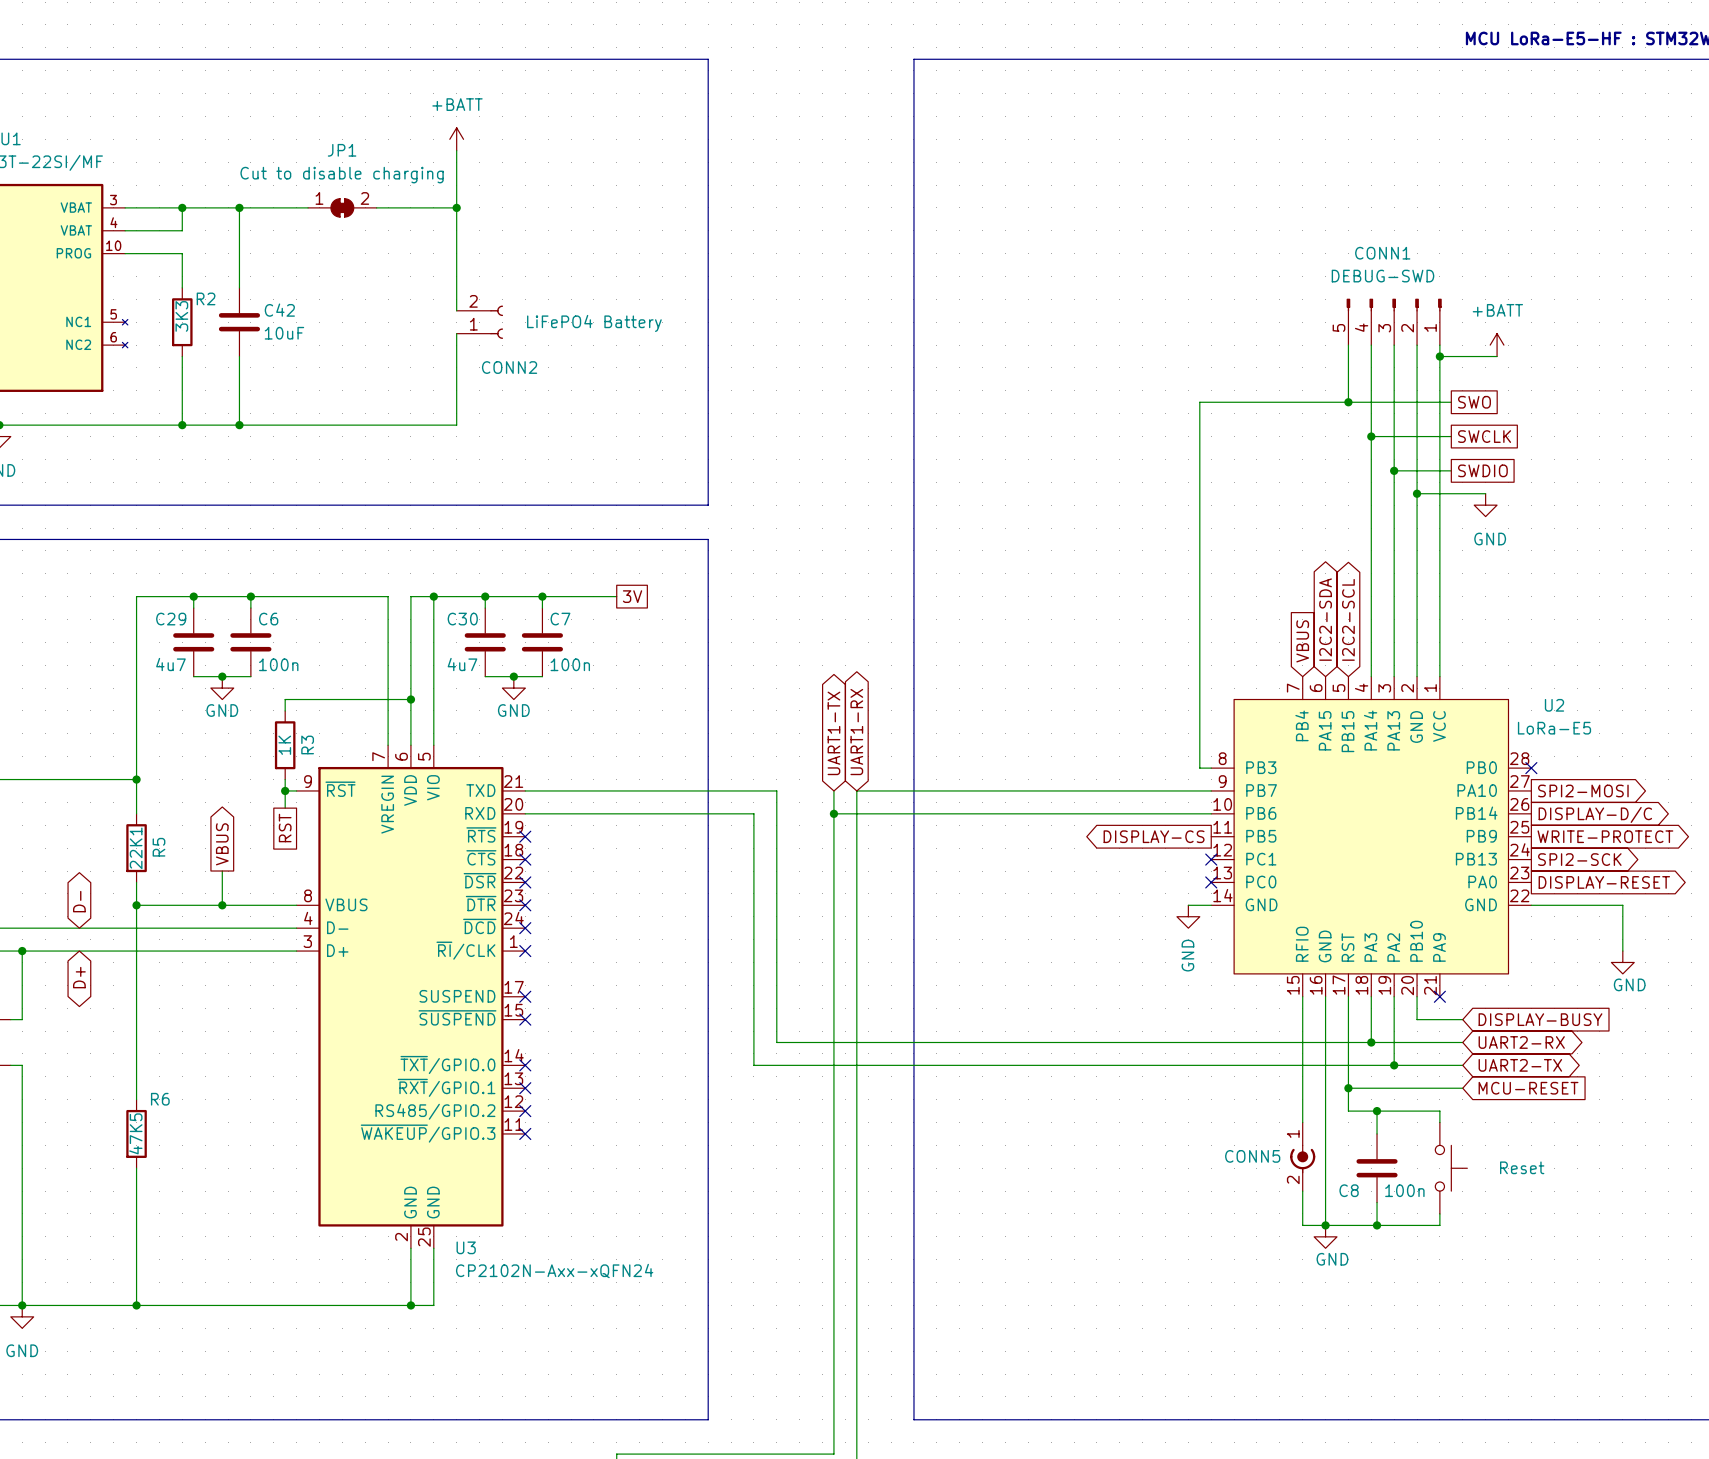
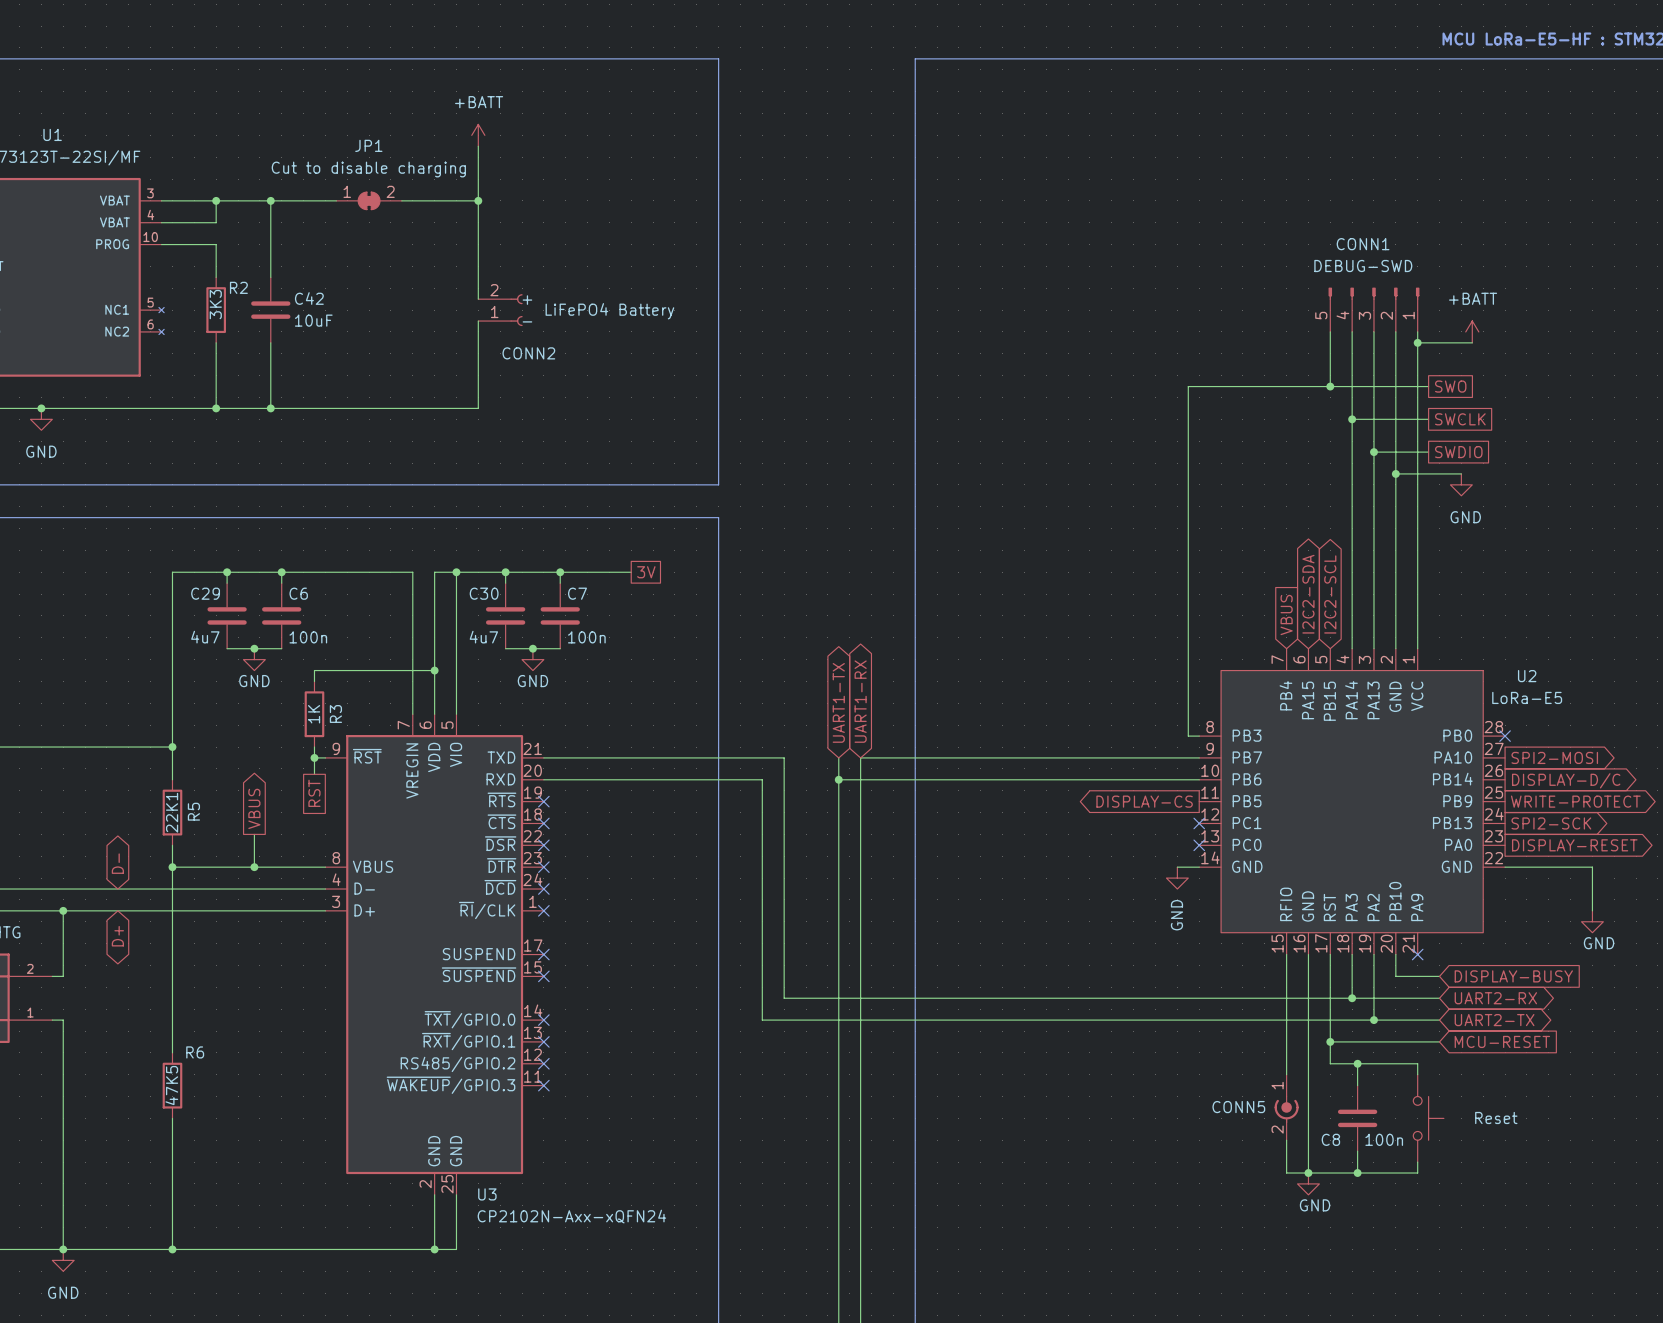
CONN2 pin name: none -> + (527, 300)
CONN2 pin name: none -> - (527, 321)

